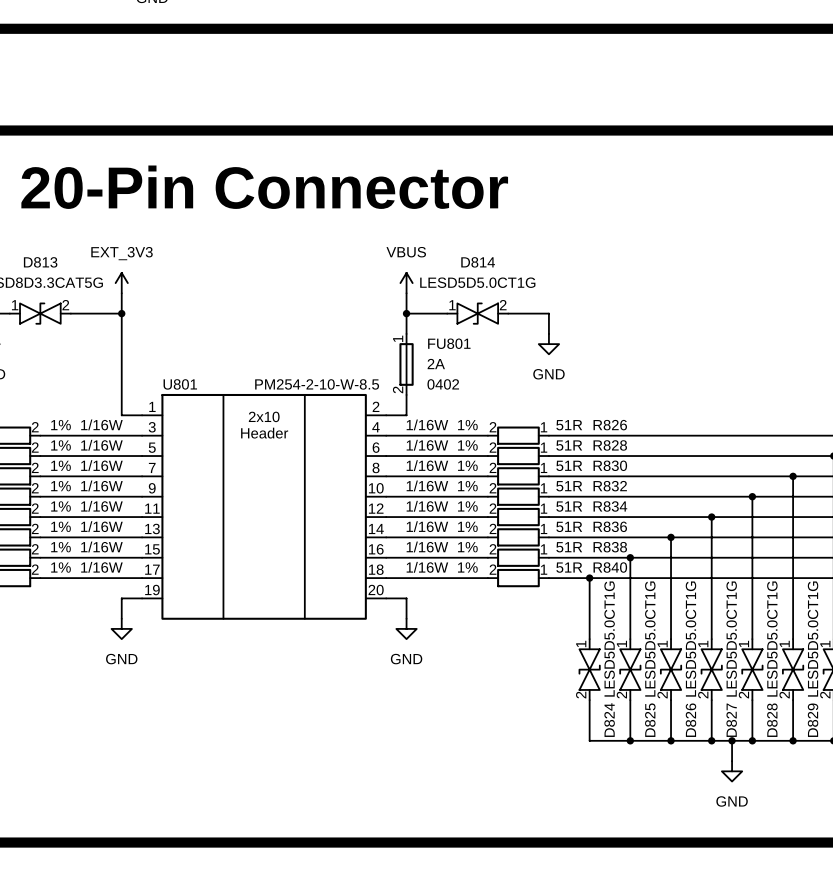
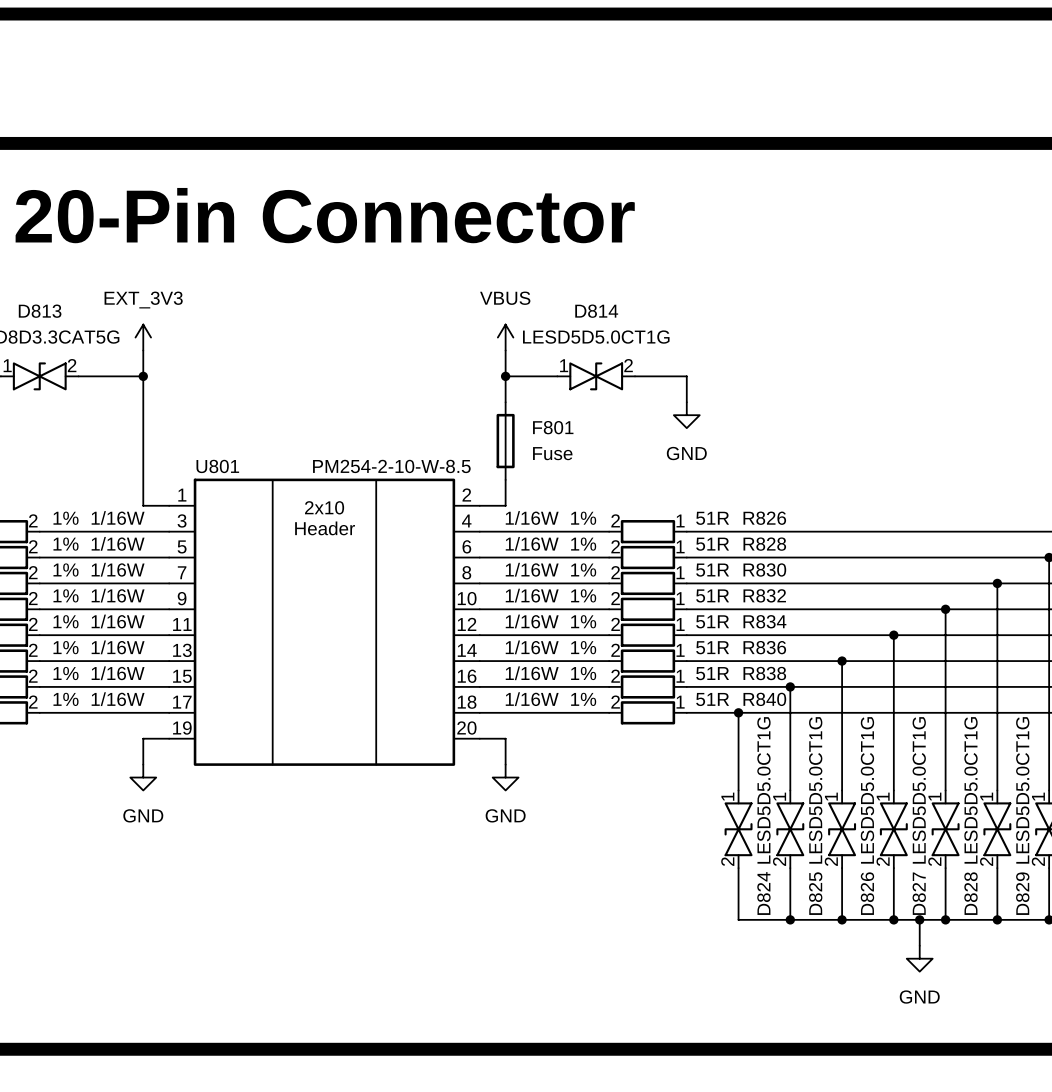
FU801 pin number: 1 (398, 338) -> none
FU801 name: FU801 (449, 343) -> F801 (553, 427)
FU801 text: 2A (436, 364) -> none
FU801 value: none -> Fuse (552, 453)
FU801 text: 0402 (443, 384) -> none
FU801 pin number: 2 (398, 389) -> none

